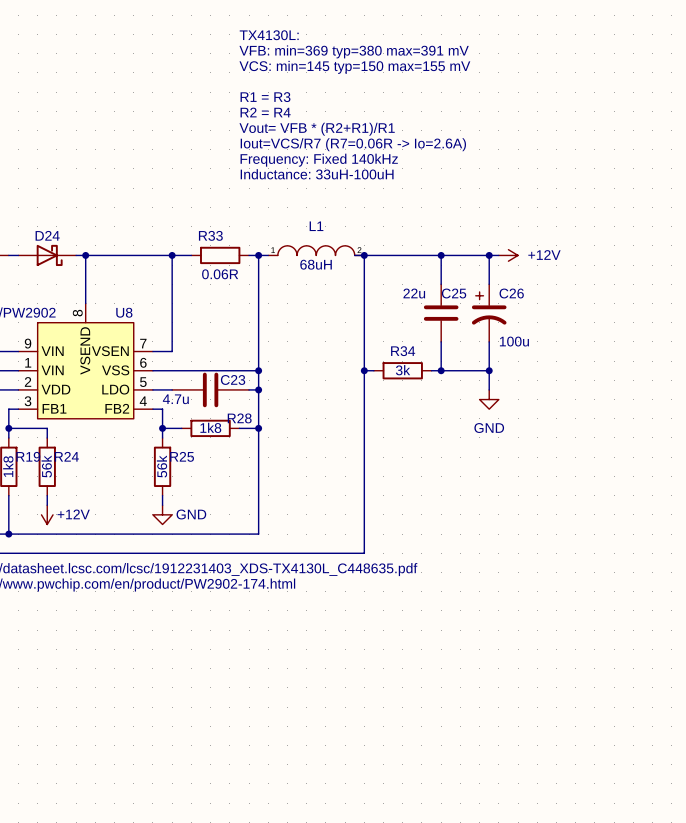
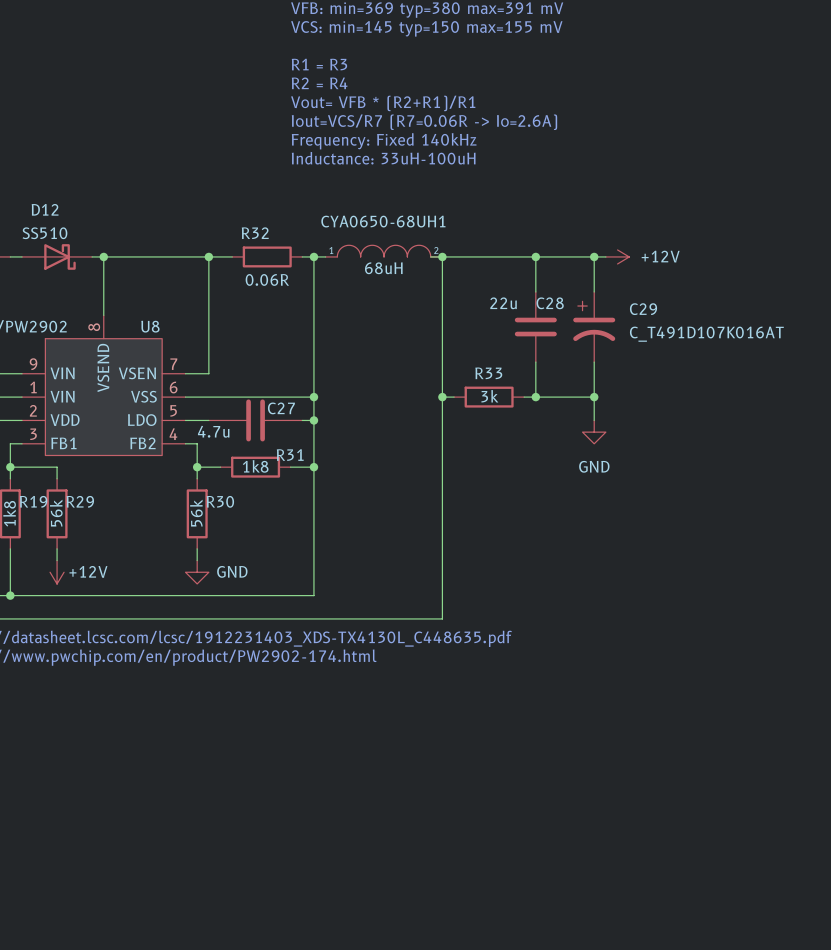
L1 name: L1 (316, 226) -> CYA0650-68UH1 (383, 221)
D24 value: none -> SS510 (44, 233)
D24 name: D24 (47, 235) -> D12 (45, 209)
R33 name: R33 (210, 235) -> R32 (255, 233)
C25 name: C25 (454, 293) -> C28 (550, 303)
C26 name: C26 (511, 293) -> C29 (643, 309)
C26 value: 100u (514, 341) -> C_T491D107K016AT (706, 334)
R34 name: R34 (403, 351) -> R33 (488, 373)
C23 name: C23 (233, 379) -> C27 (281, 408)
R28 name: R28 (239, 418) -> R31 (290, 455)
R24 name: R24 (66, 456) -> R29 (80, 501)
R25 name: R25 (182, 456) -> R30 (220, 501)

